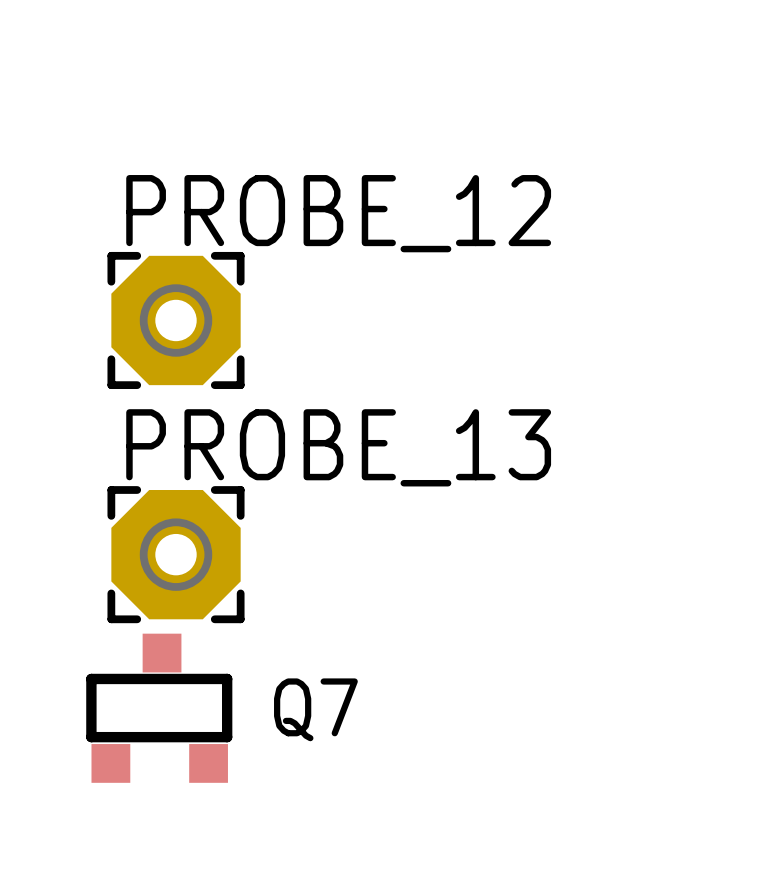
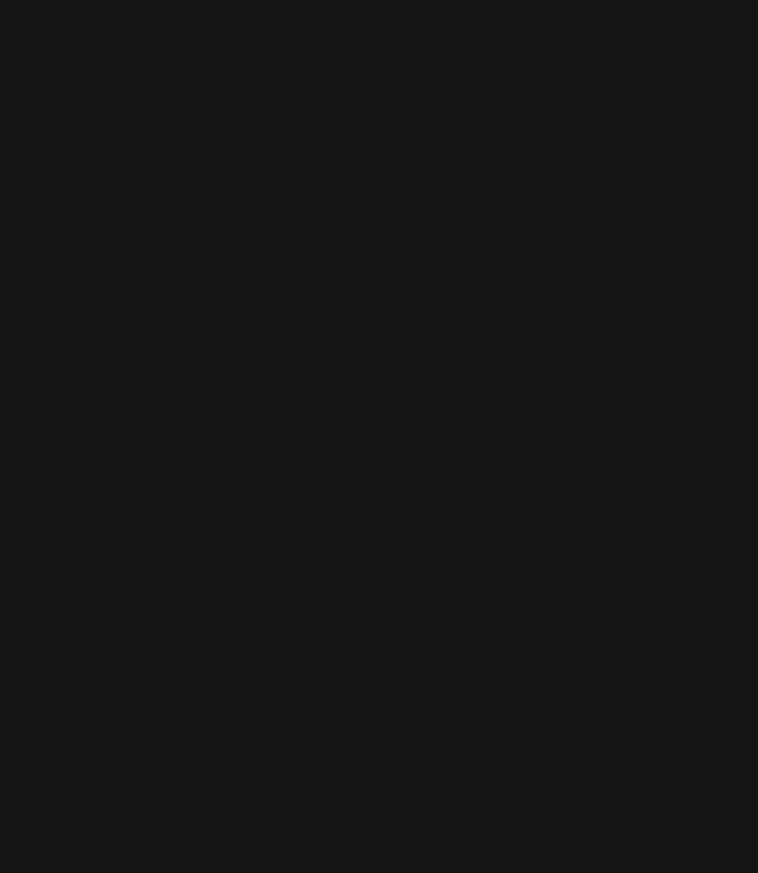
PROBE_12: (176, 320) -> none
PROBE_13: (176, 554) -> none
Q7: (159, 708) -> none

